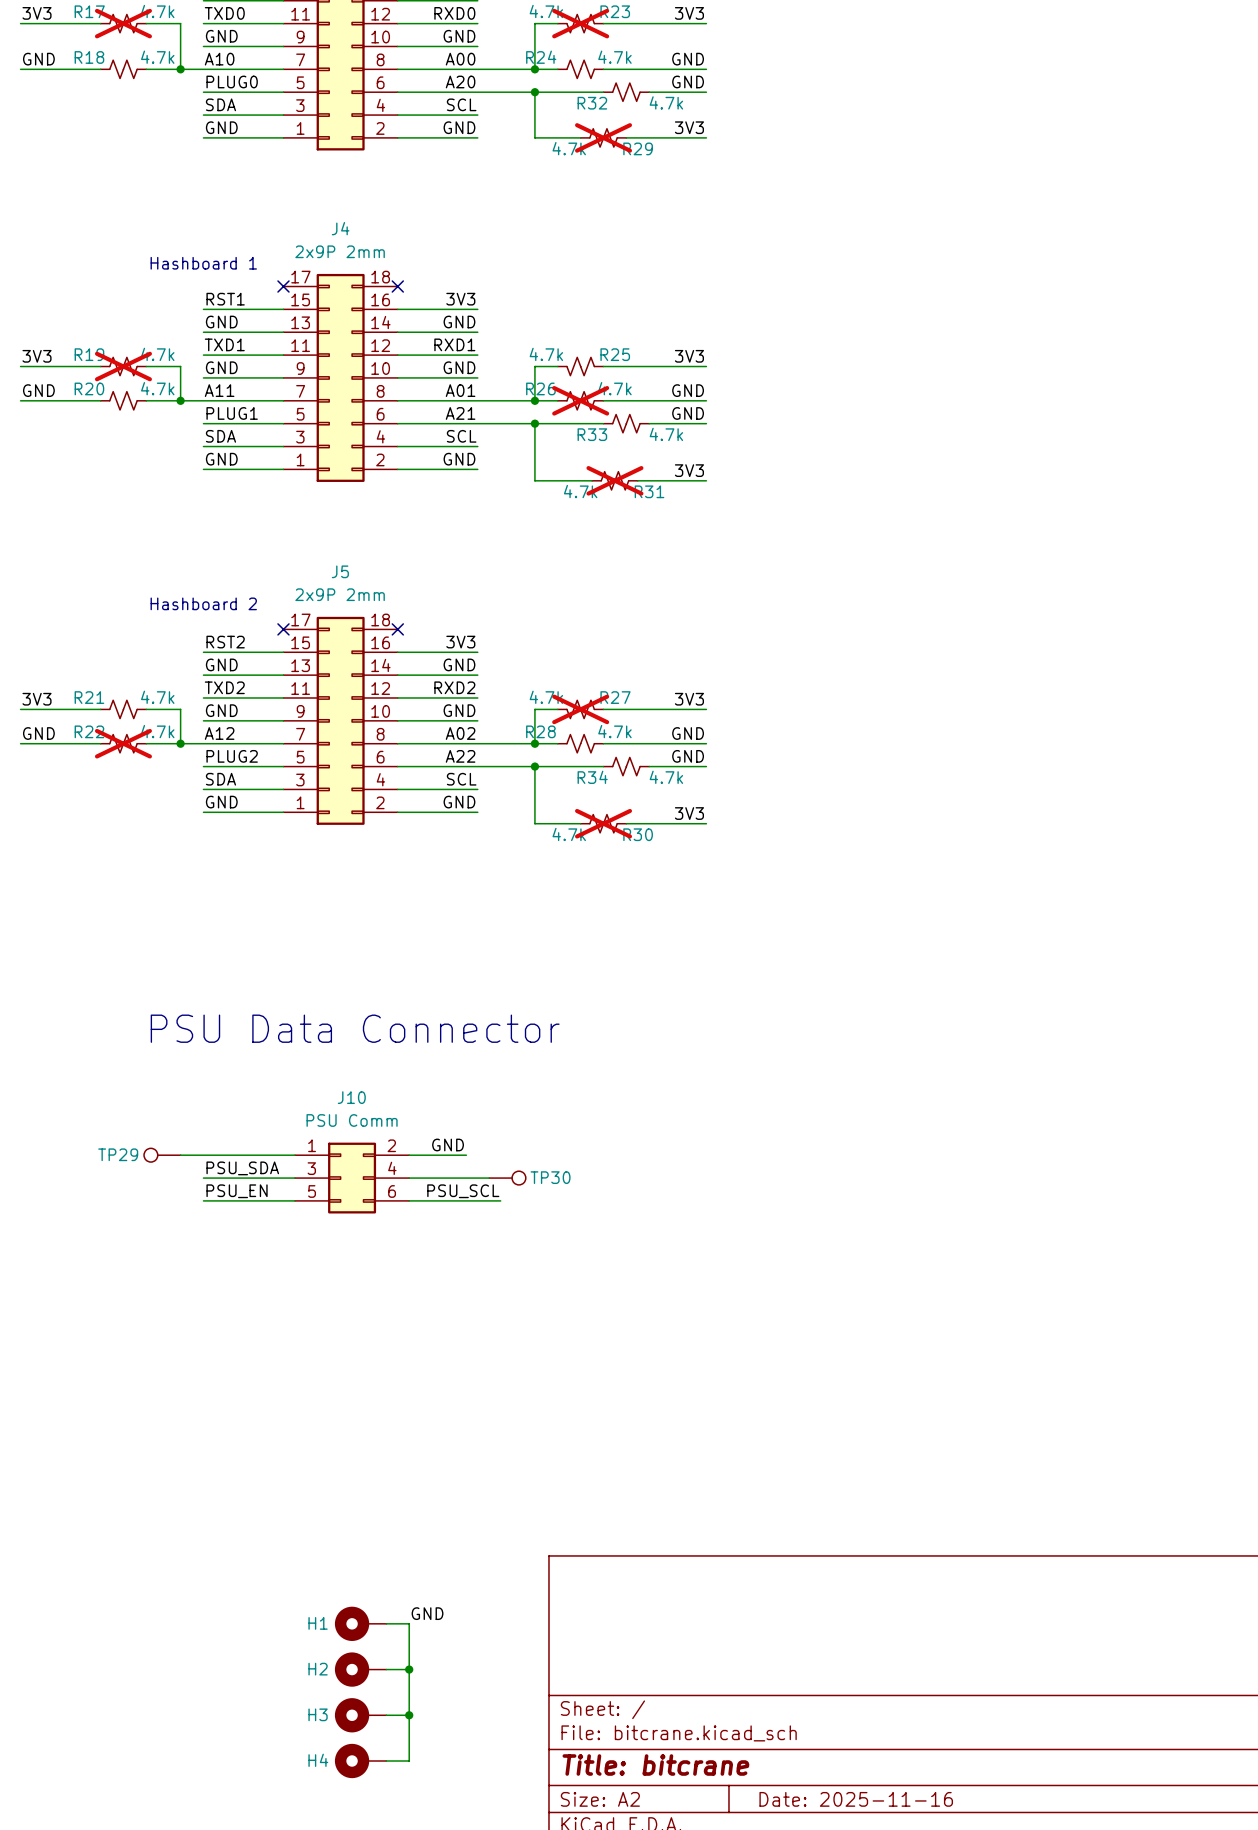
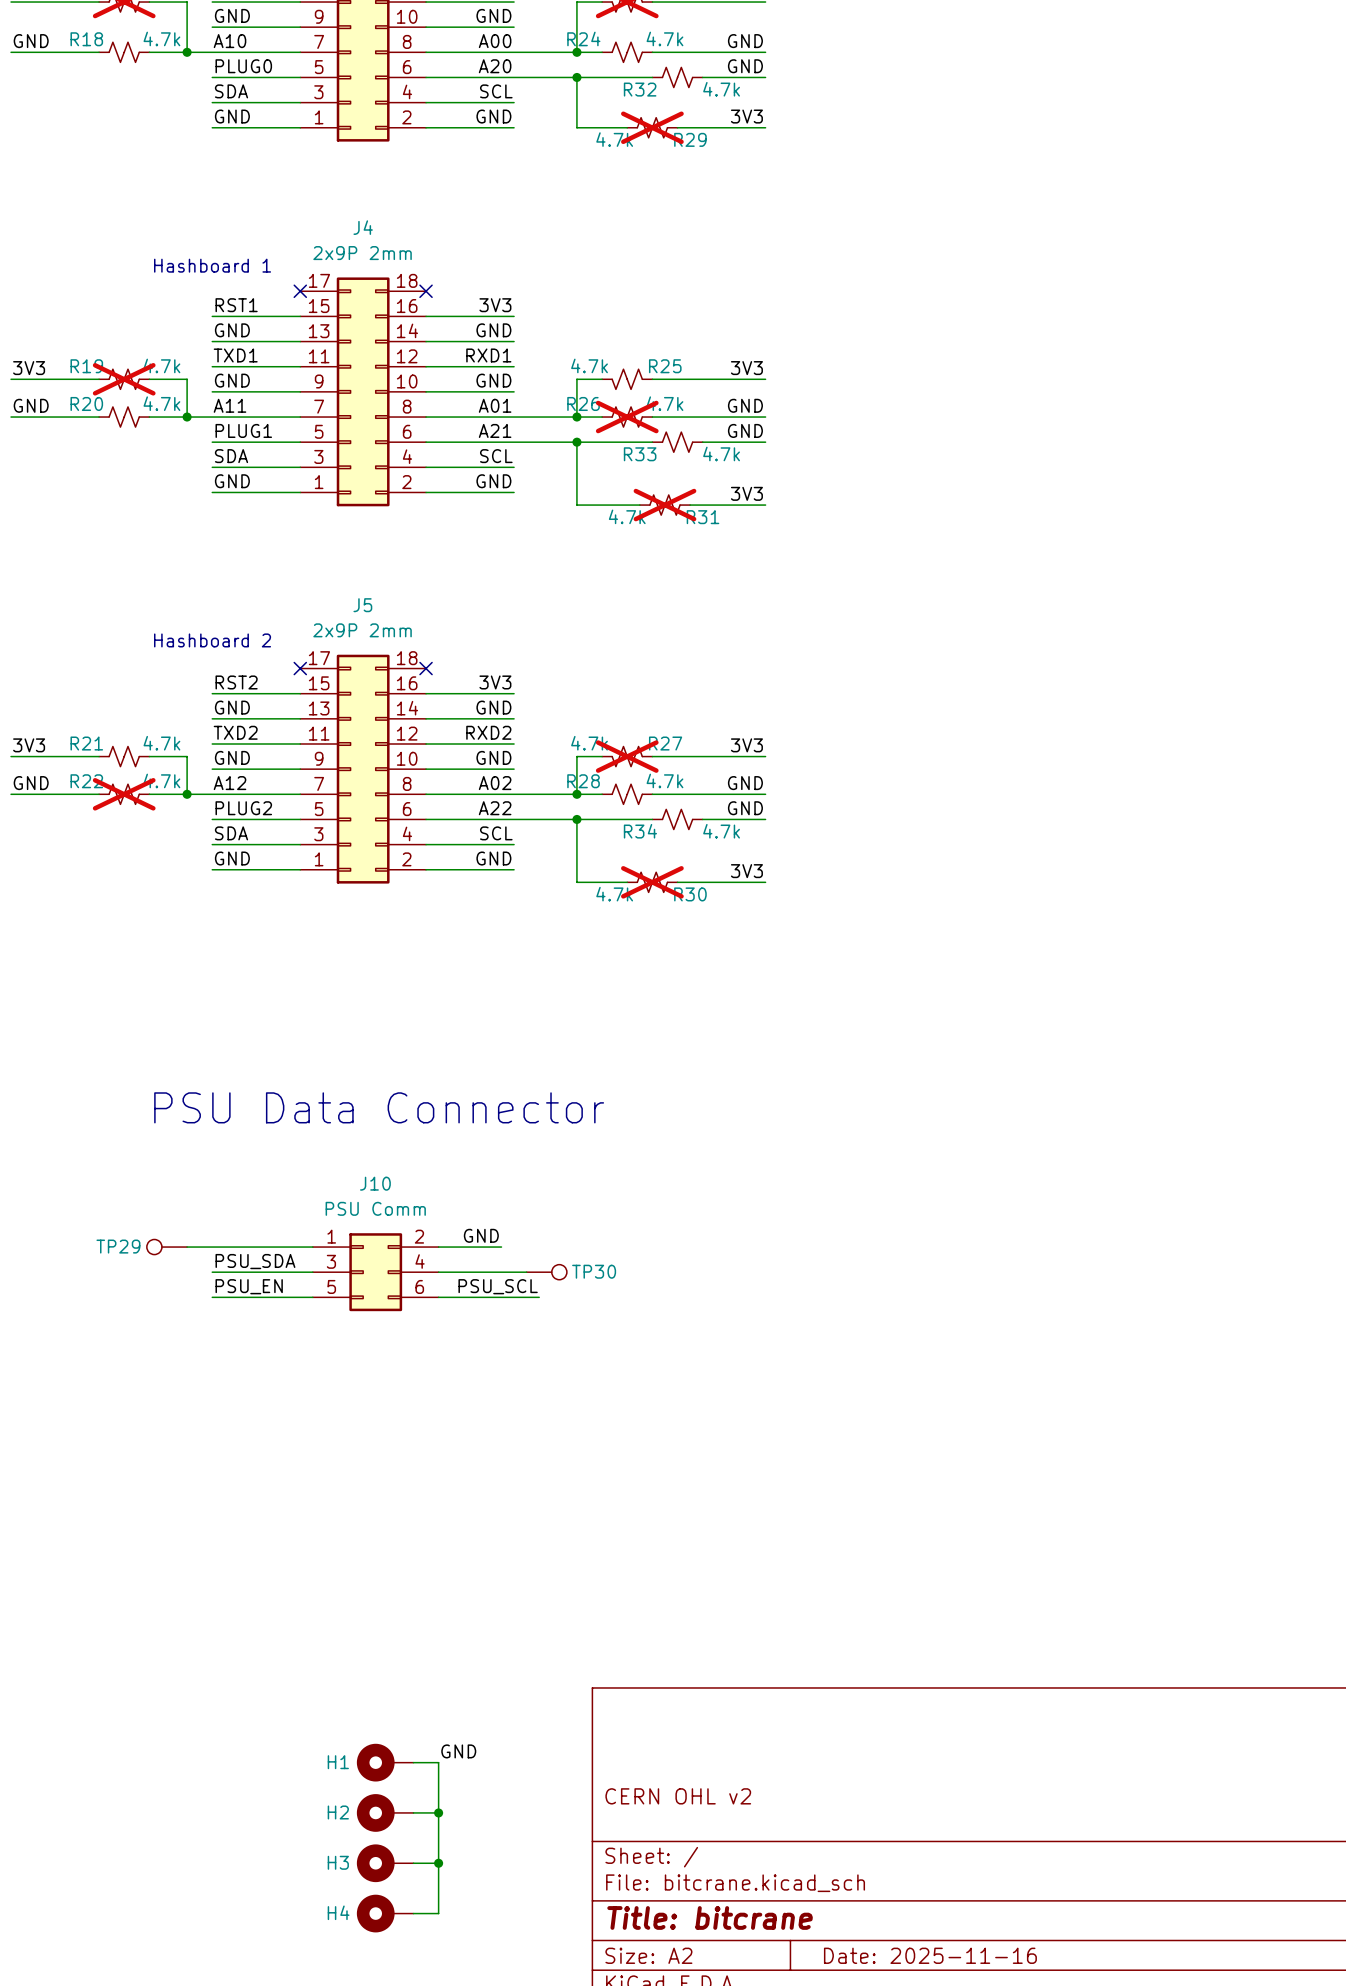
title block: none -> CERN OHL v2 (678, 1796)

